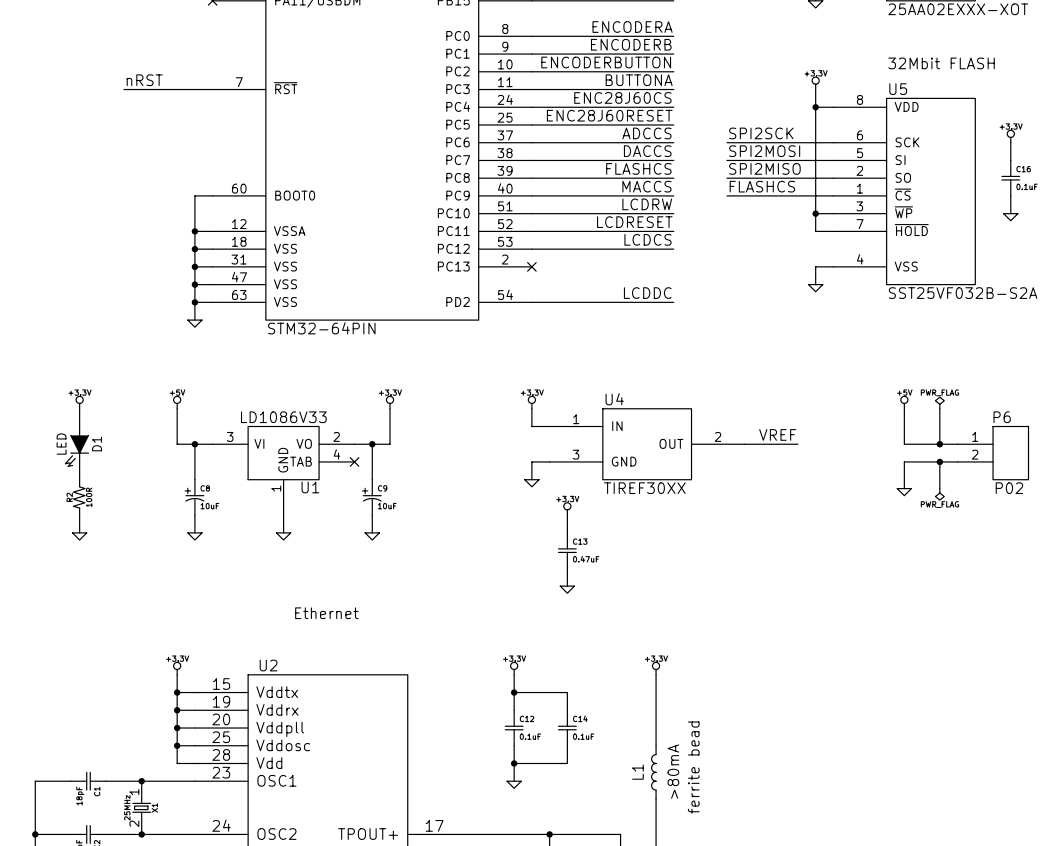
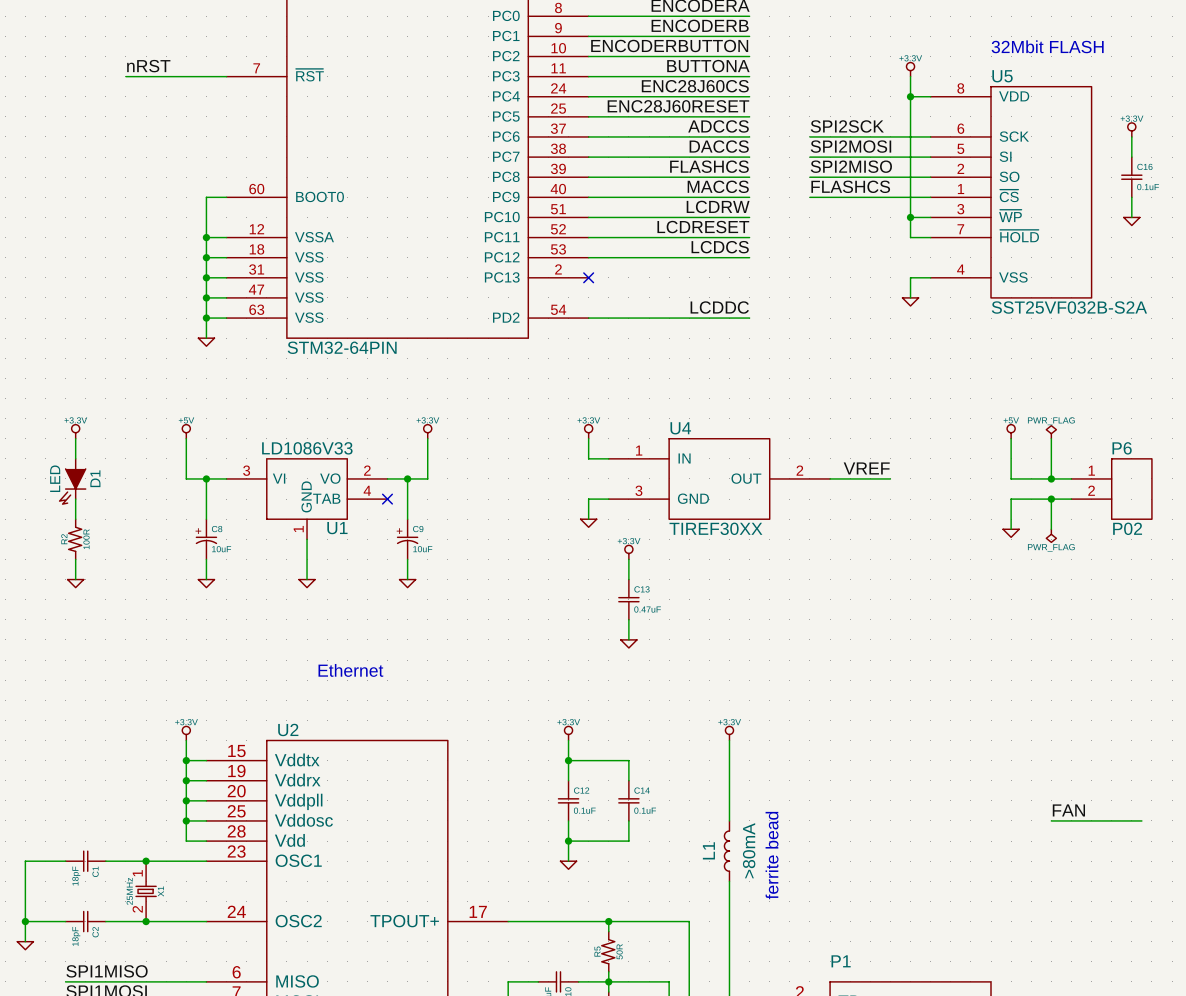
label: none -> FAN (1068, 810)
wire: none -> (1051, 820) (1141, 820)

